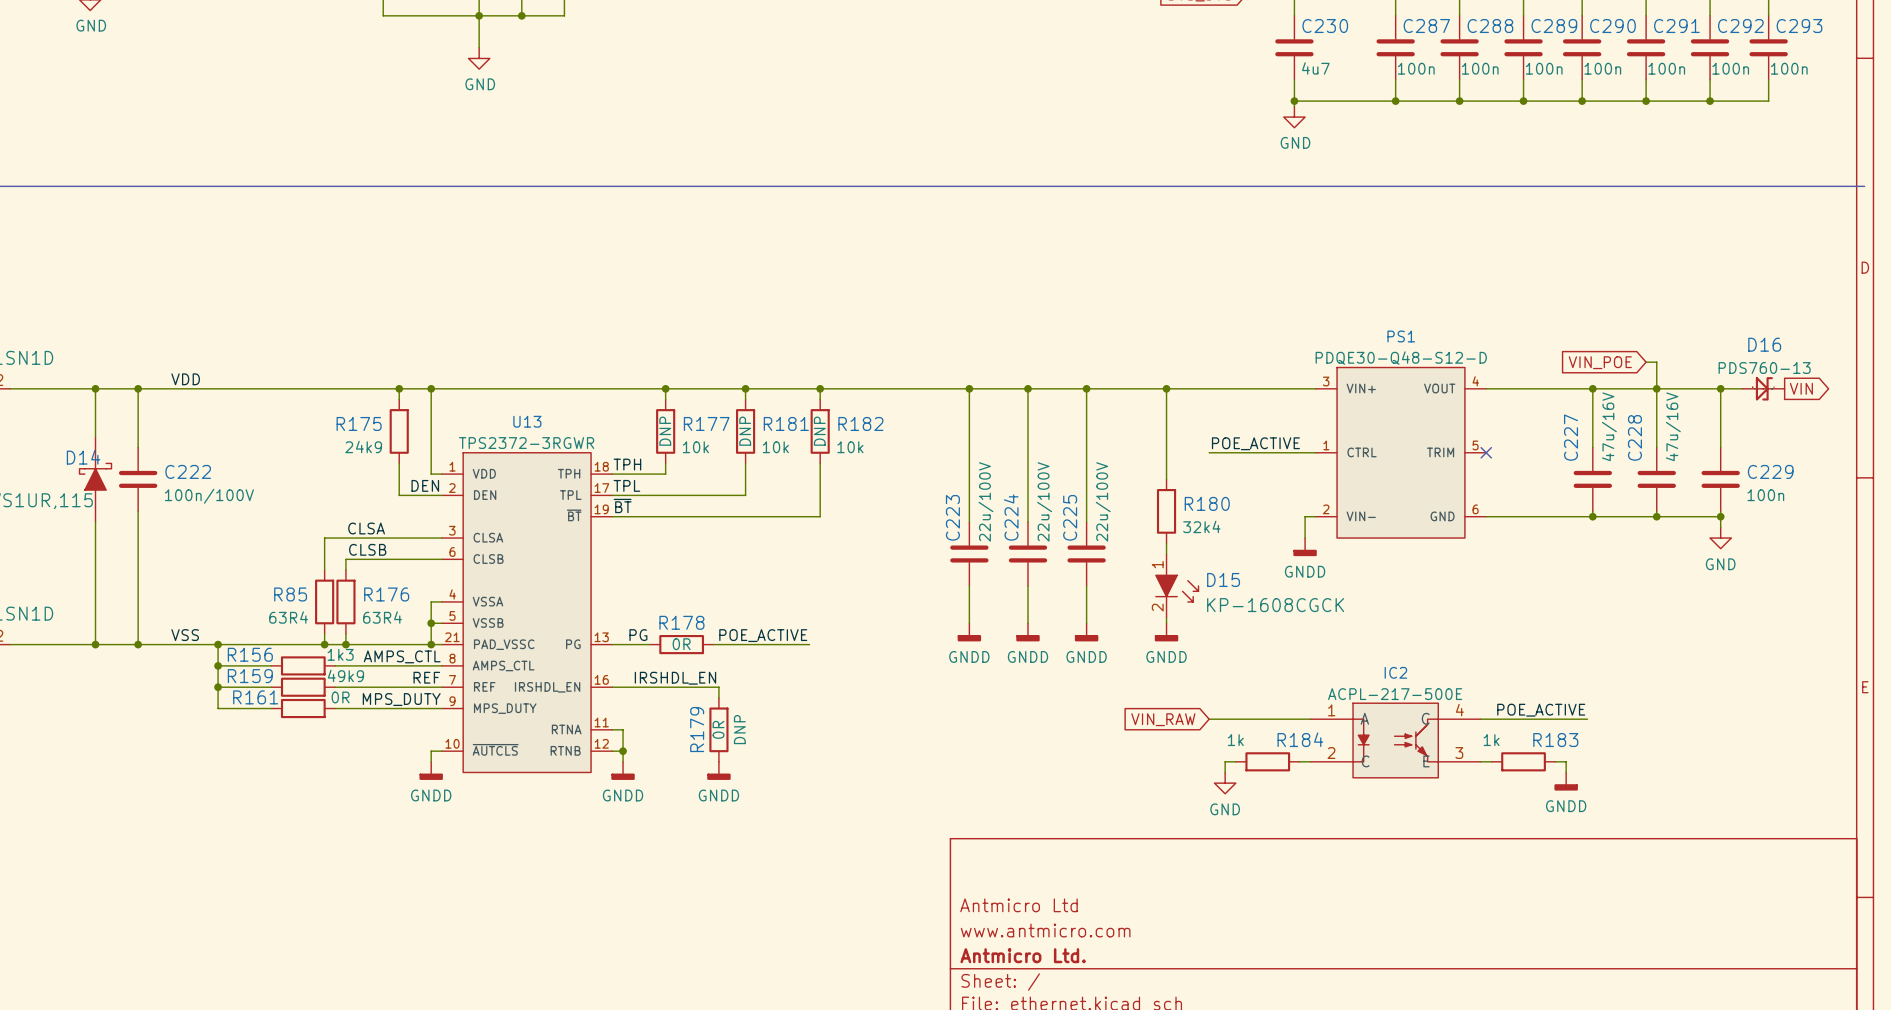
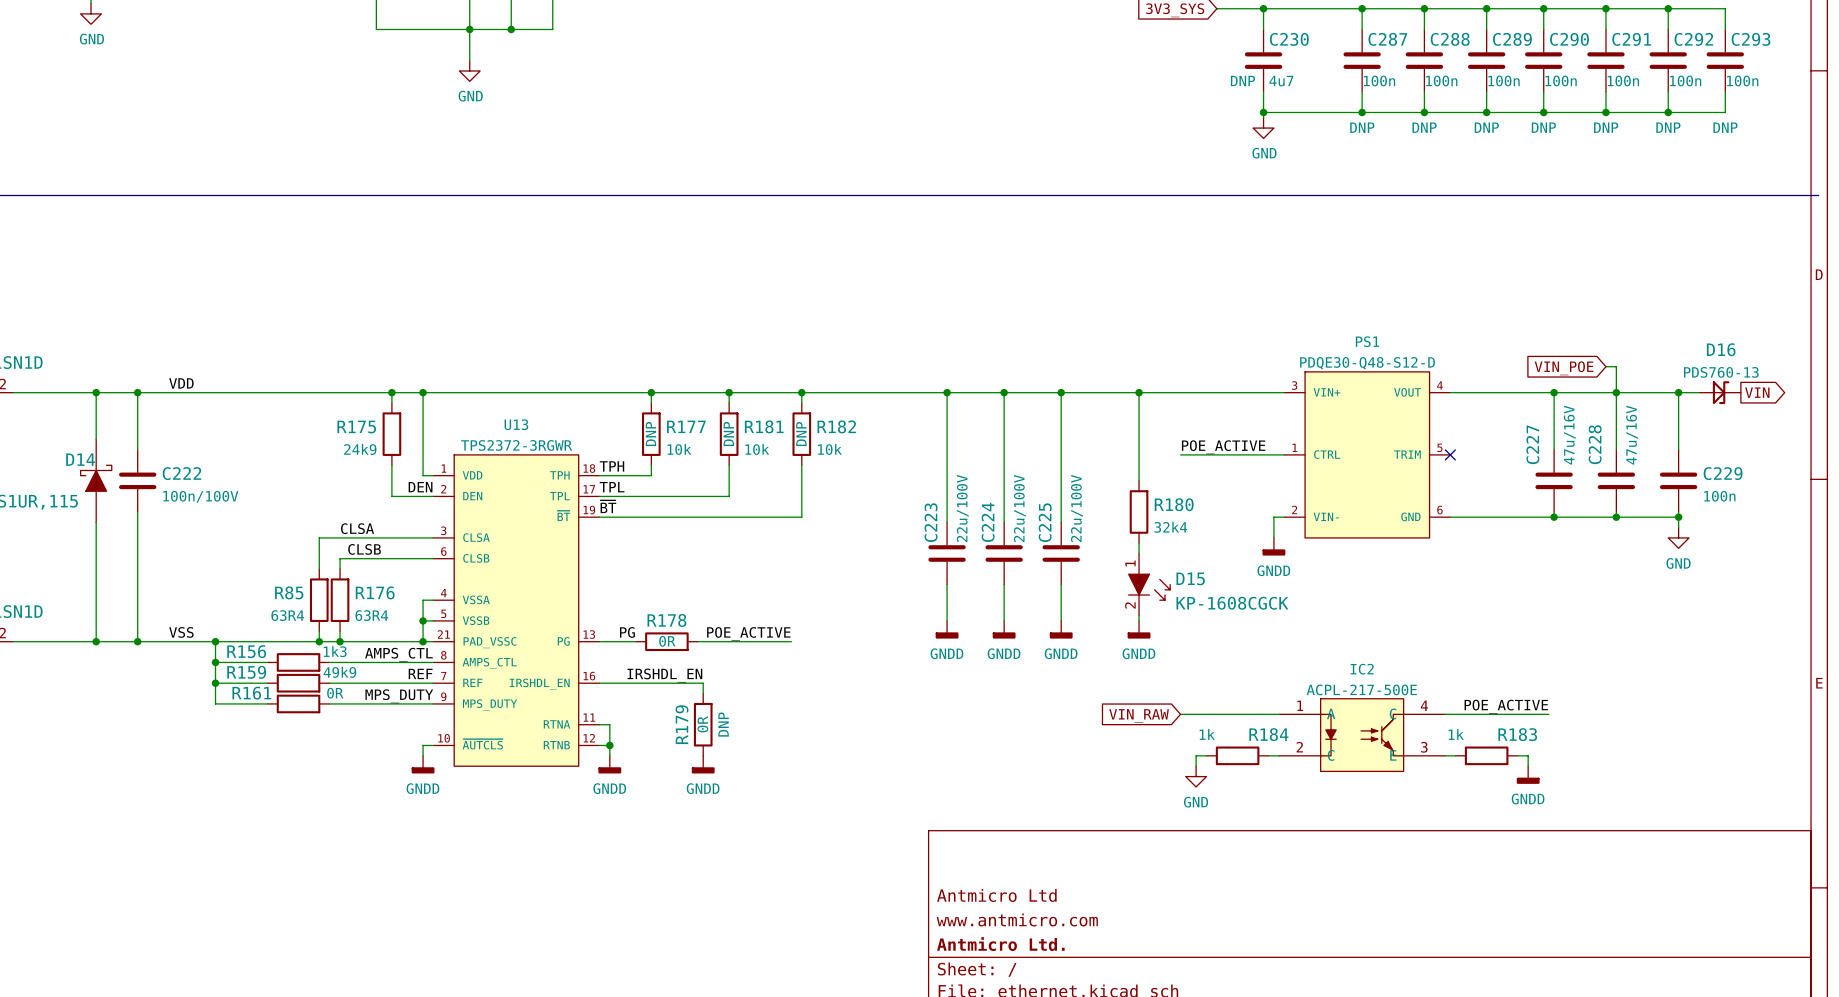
C230 text: none -> DNP (1242, 80)
C287 text: none -> DNP (1362, 127)
C288 text: none -> DNP (1424, 127)
C289 text: none -> DNP (1486, 127)
C290 text: none -> DNP (1543, 127)
C291 text: none -> DNP (1606, 127)
C292 text: none -> DNP (1668, 127)
C293 text: none -> DNP (1725, 127)

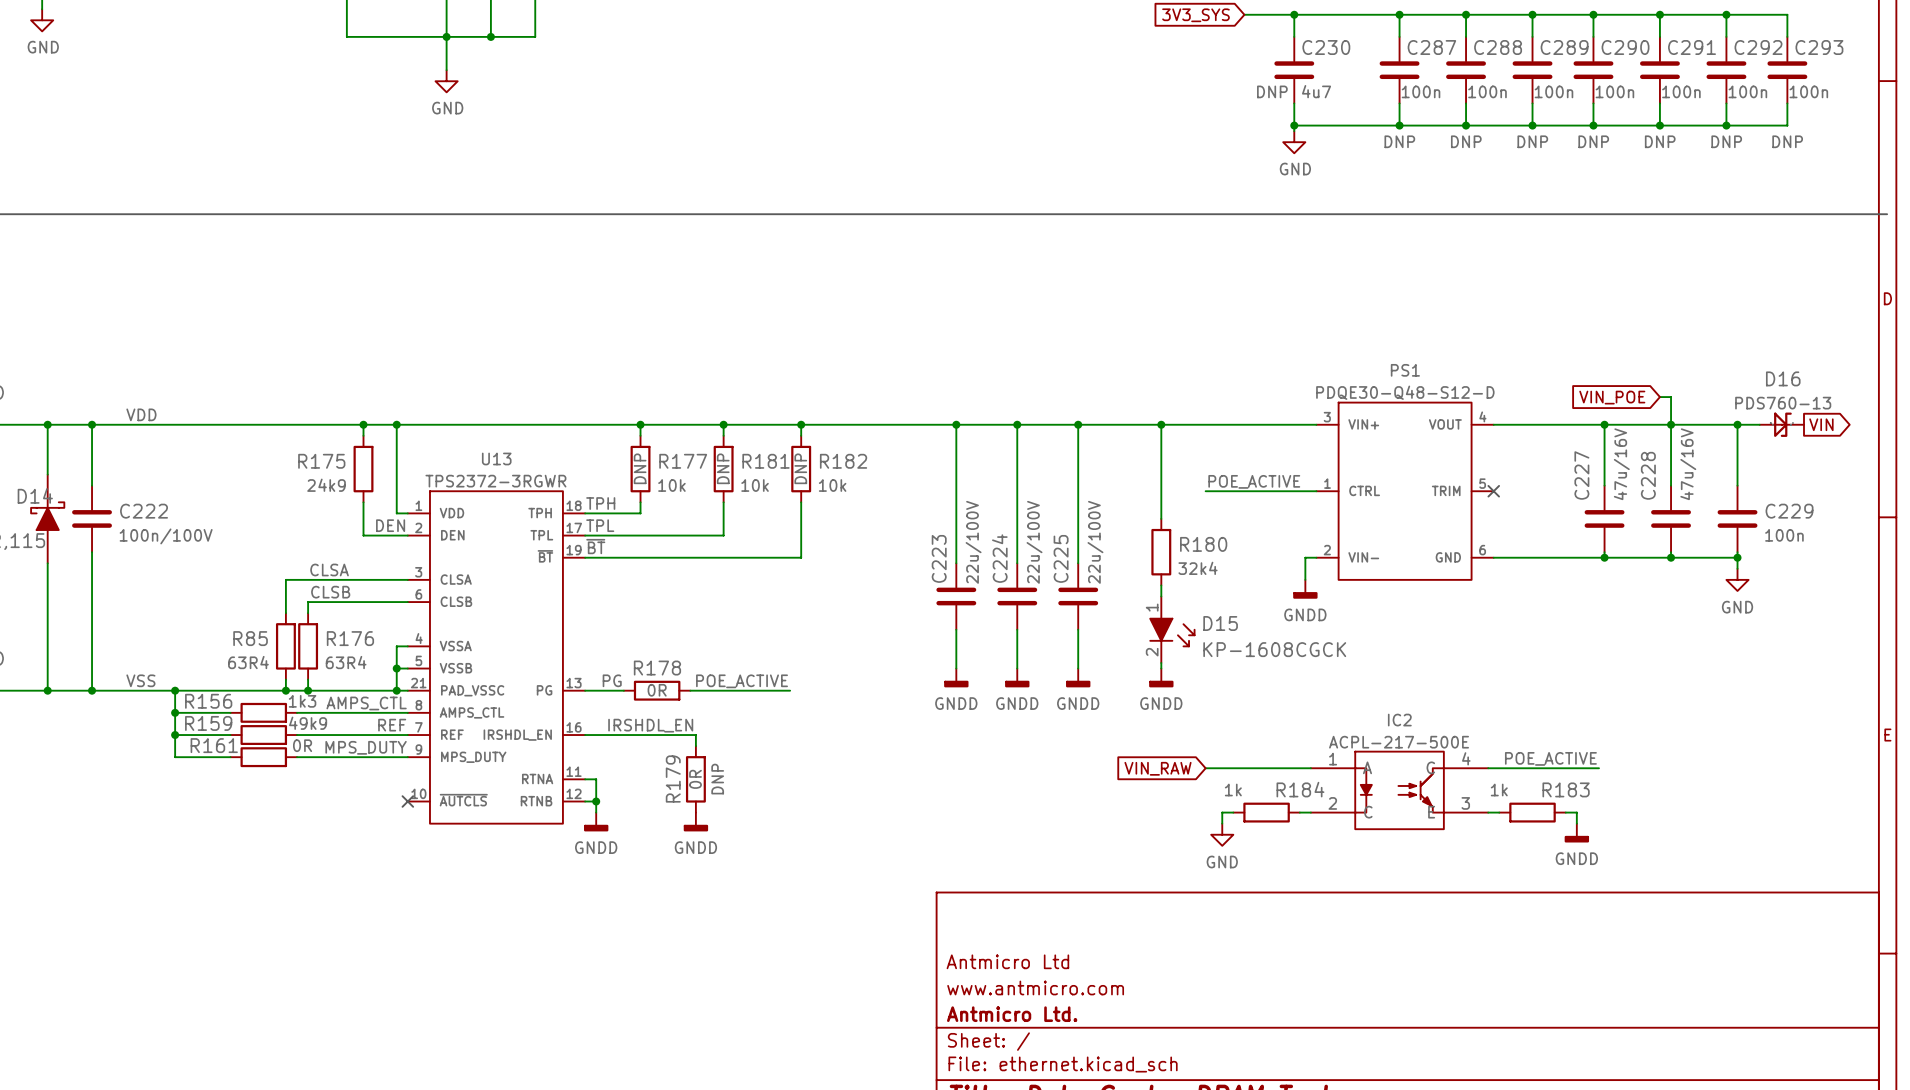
wire: (433, 745) (423, 745) (423, 755) -> none
no-connect mark: none -> (407, 801)
power symbol: GNDD (423, 764) -> none

